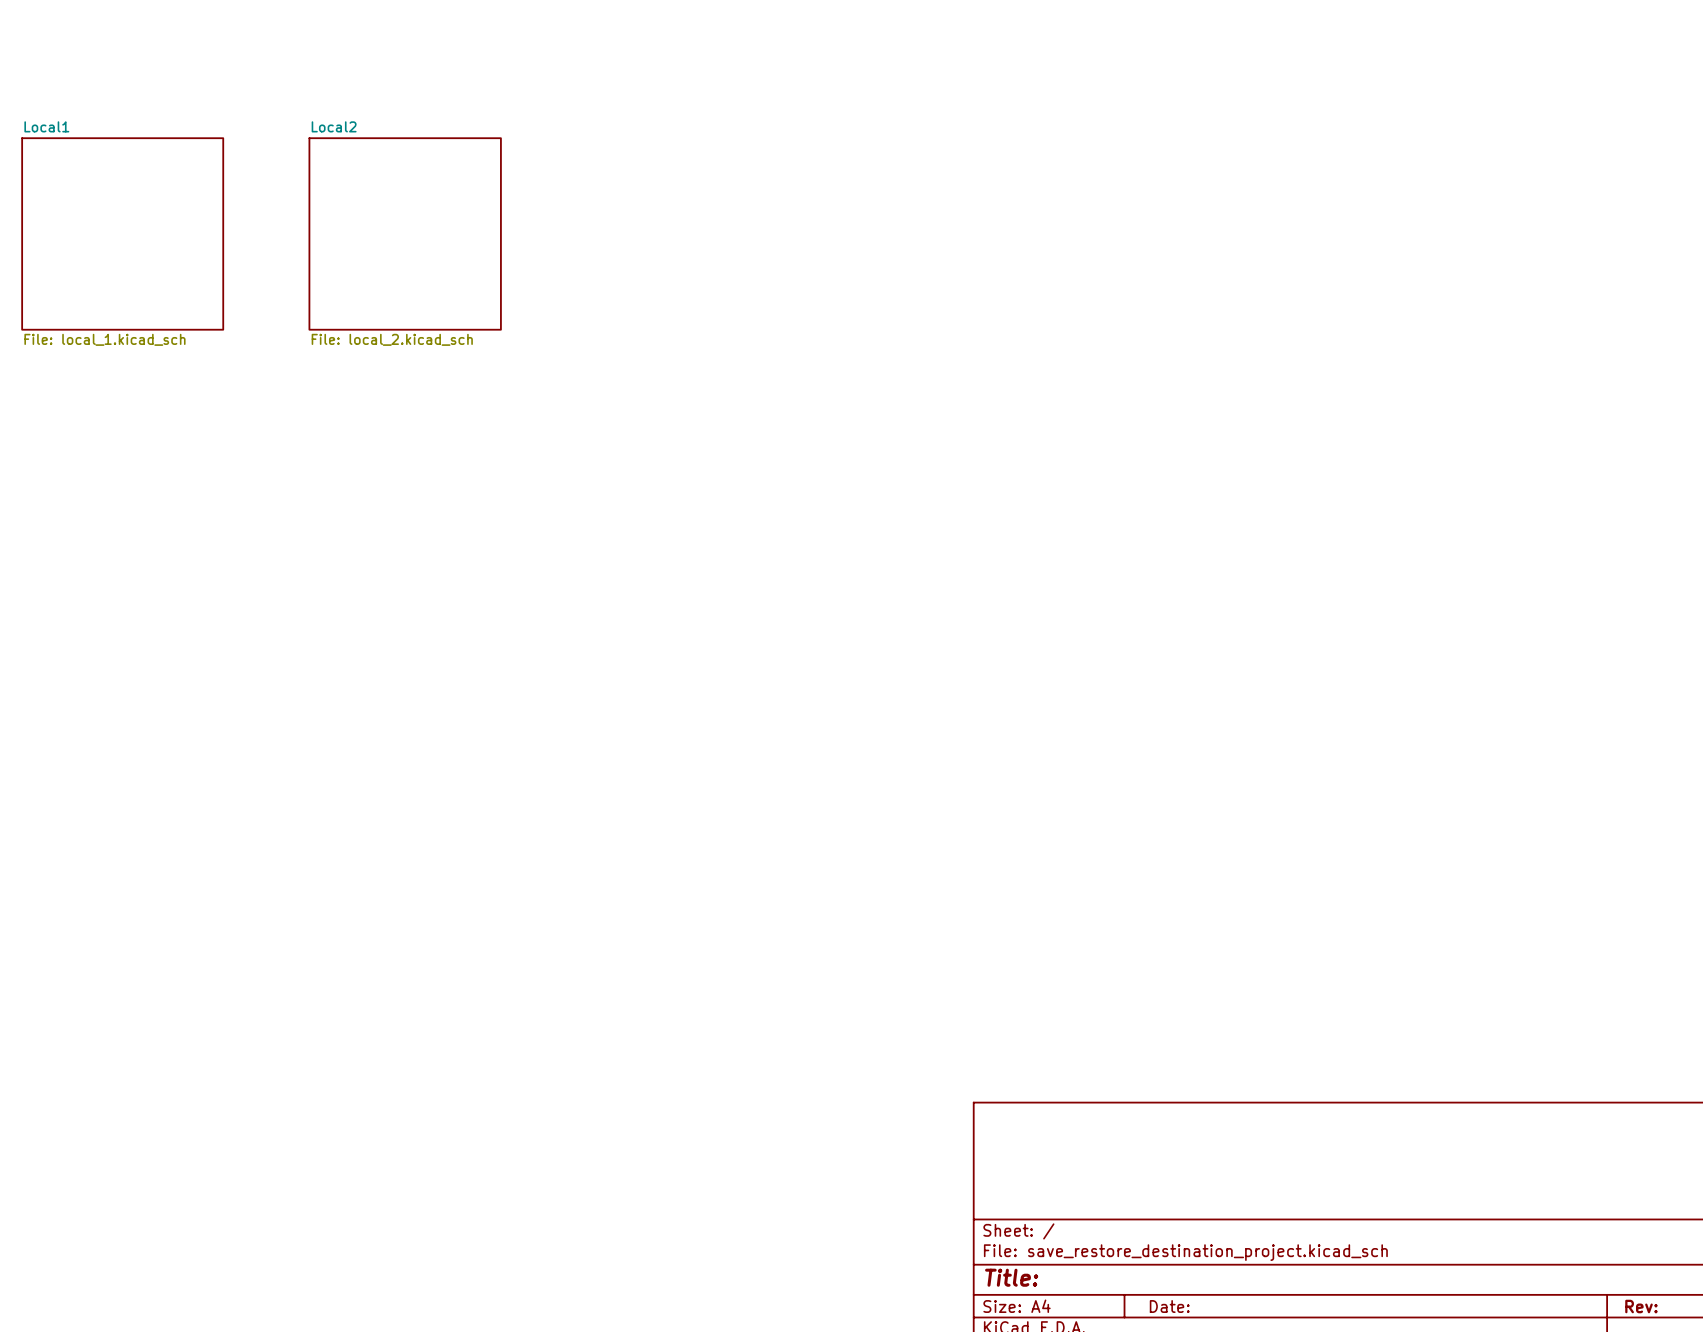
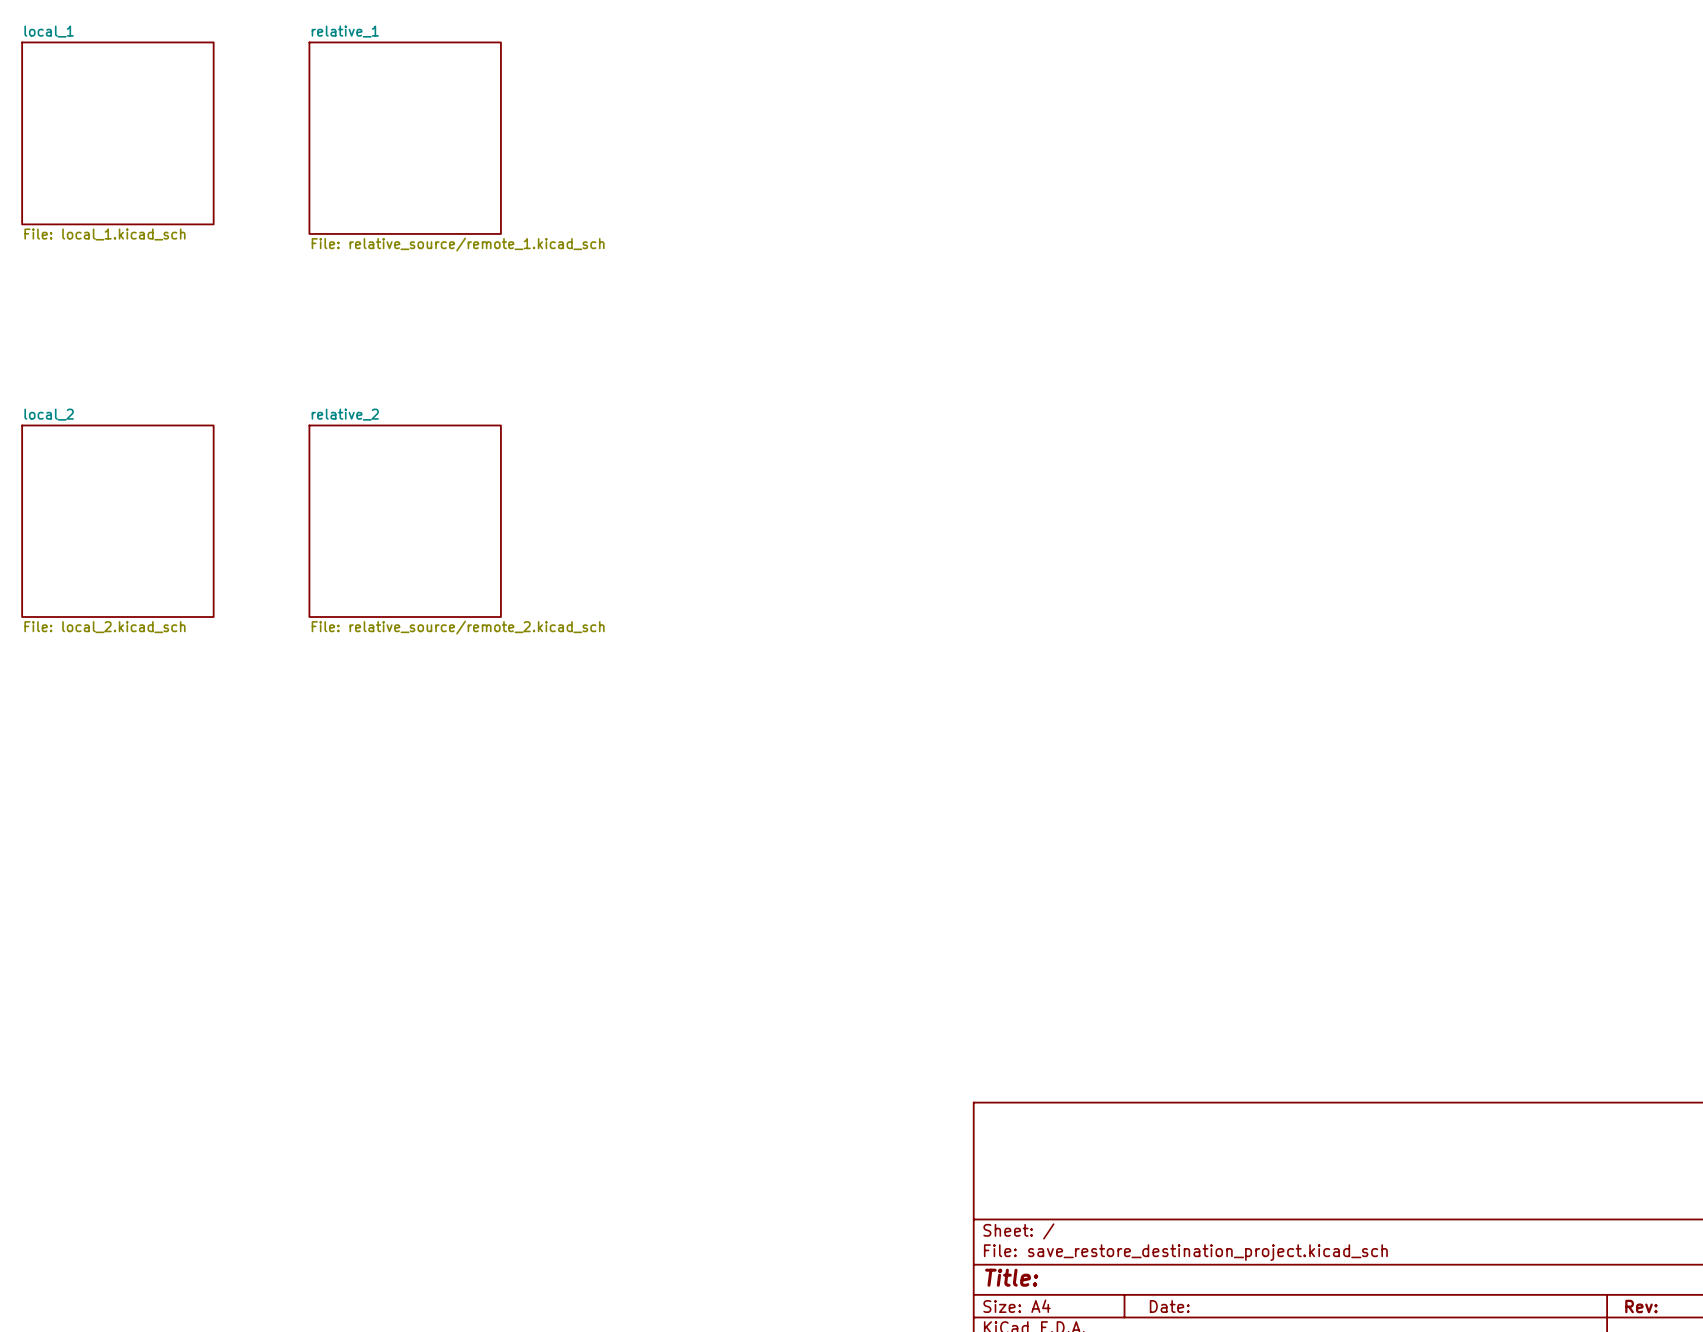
sheet local_1: none -> File: local_1.kicad_sch (117, 133)
sheet relative_1: none -> File: relative_source/remote_1.kicad_sch (405, 138)
sheet Local1: File: local_1.kicad_sch (122, 233) -> none
sheet Local2: File: local_2.kicad_sch (405, 233) -> none
sheet local_2: none -> File: local_2.kicad_sch (117, 521)
sheet relative_2: none -> File: relative_source/remote_2.kicad_sch (405, 521)

